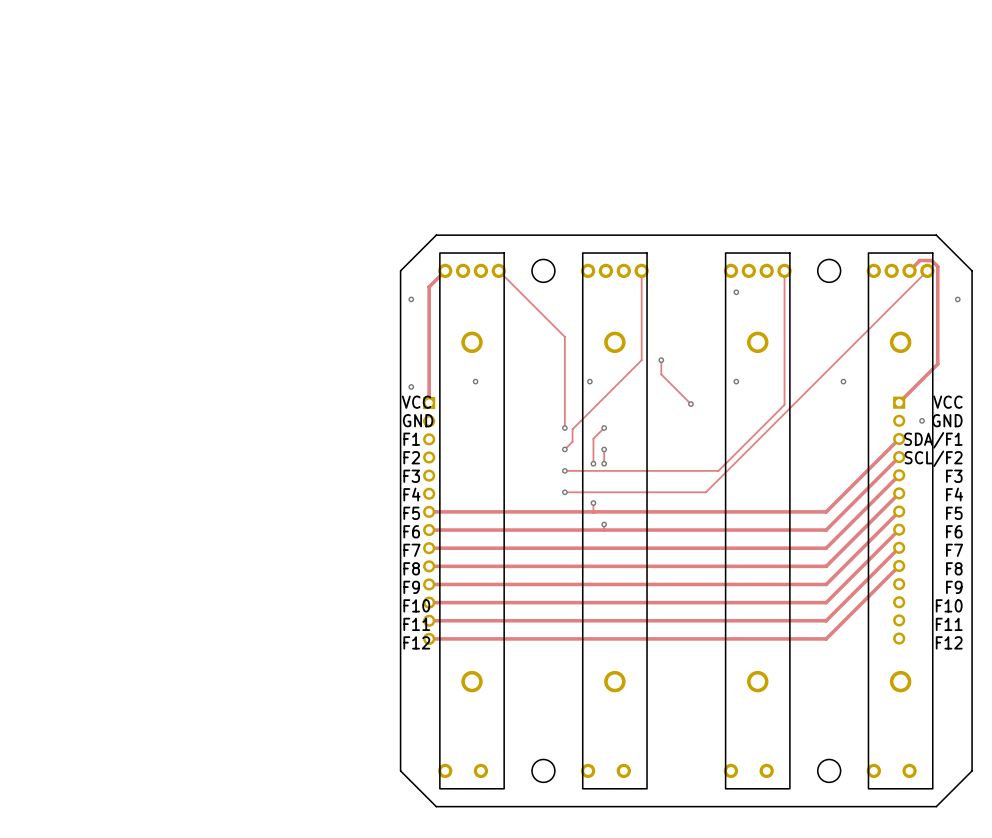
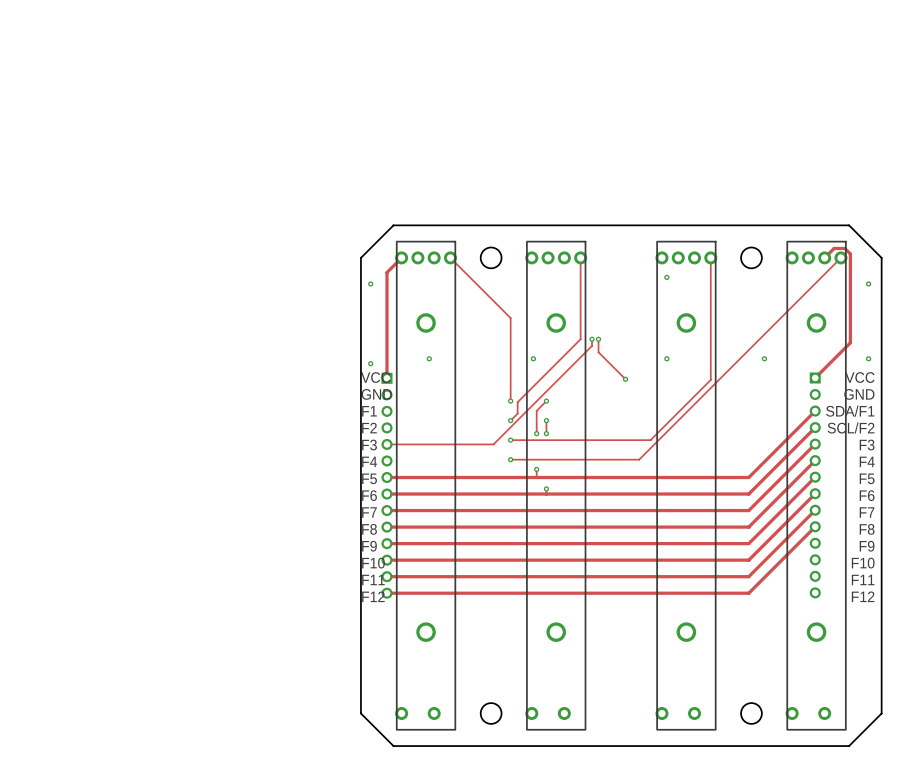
track: none -> (592, 339) (592, 345) (493, 444) (386, 444)
via: none -> (592, 339)
via: none -> (868, 358)
via: (922, 420) -> none

